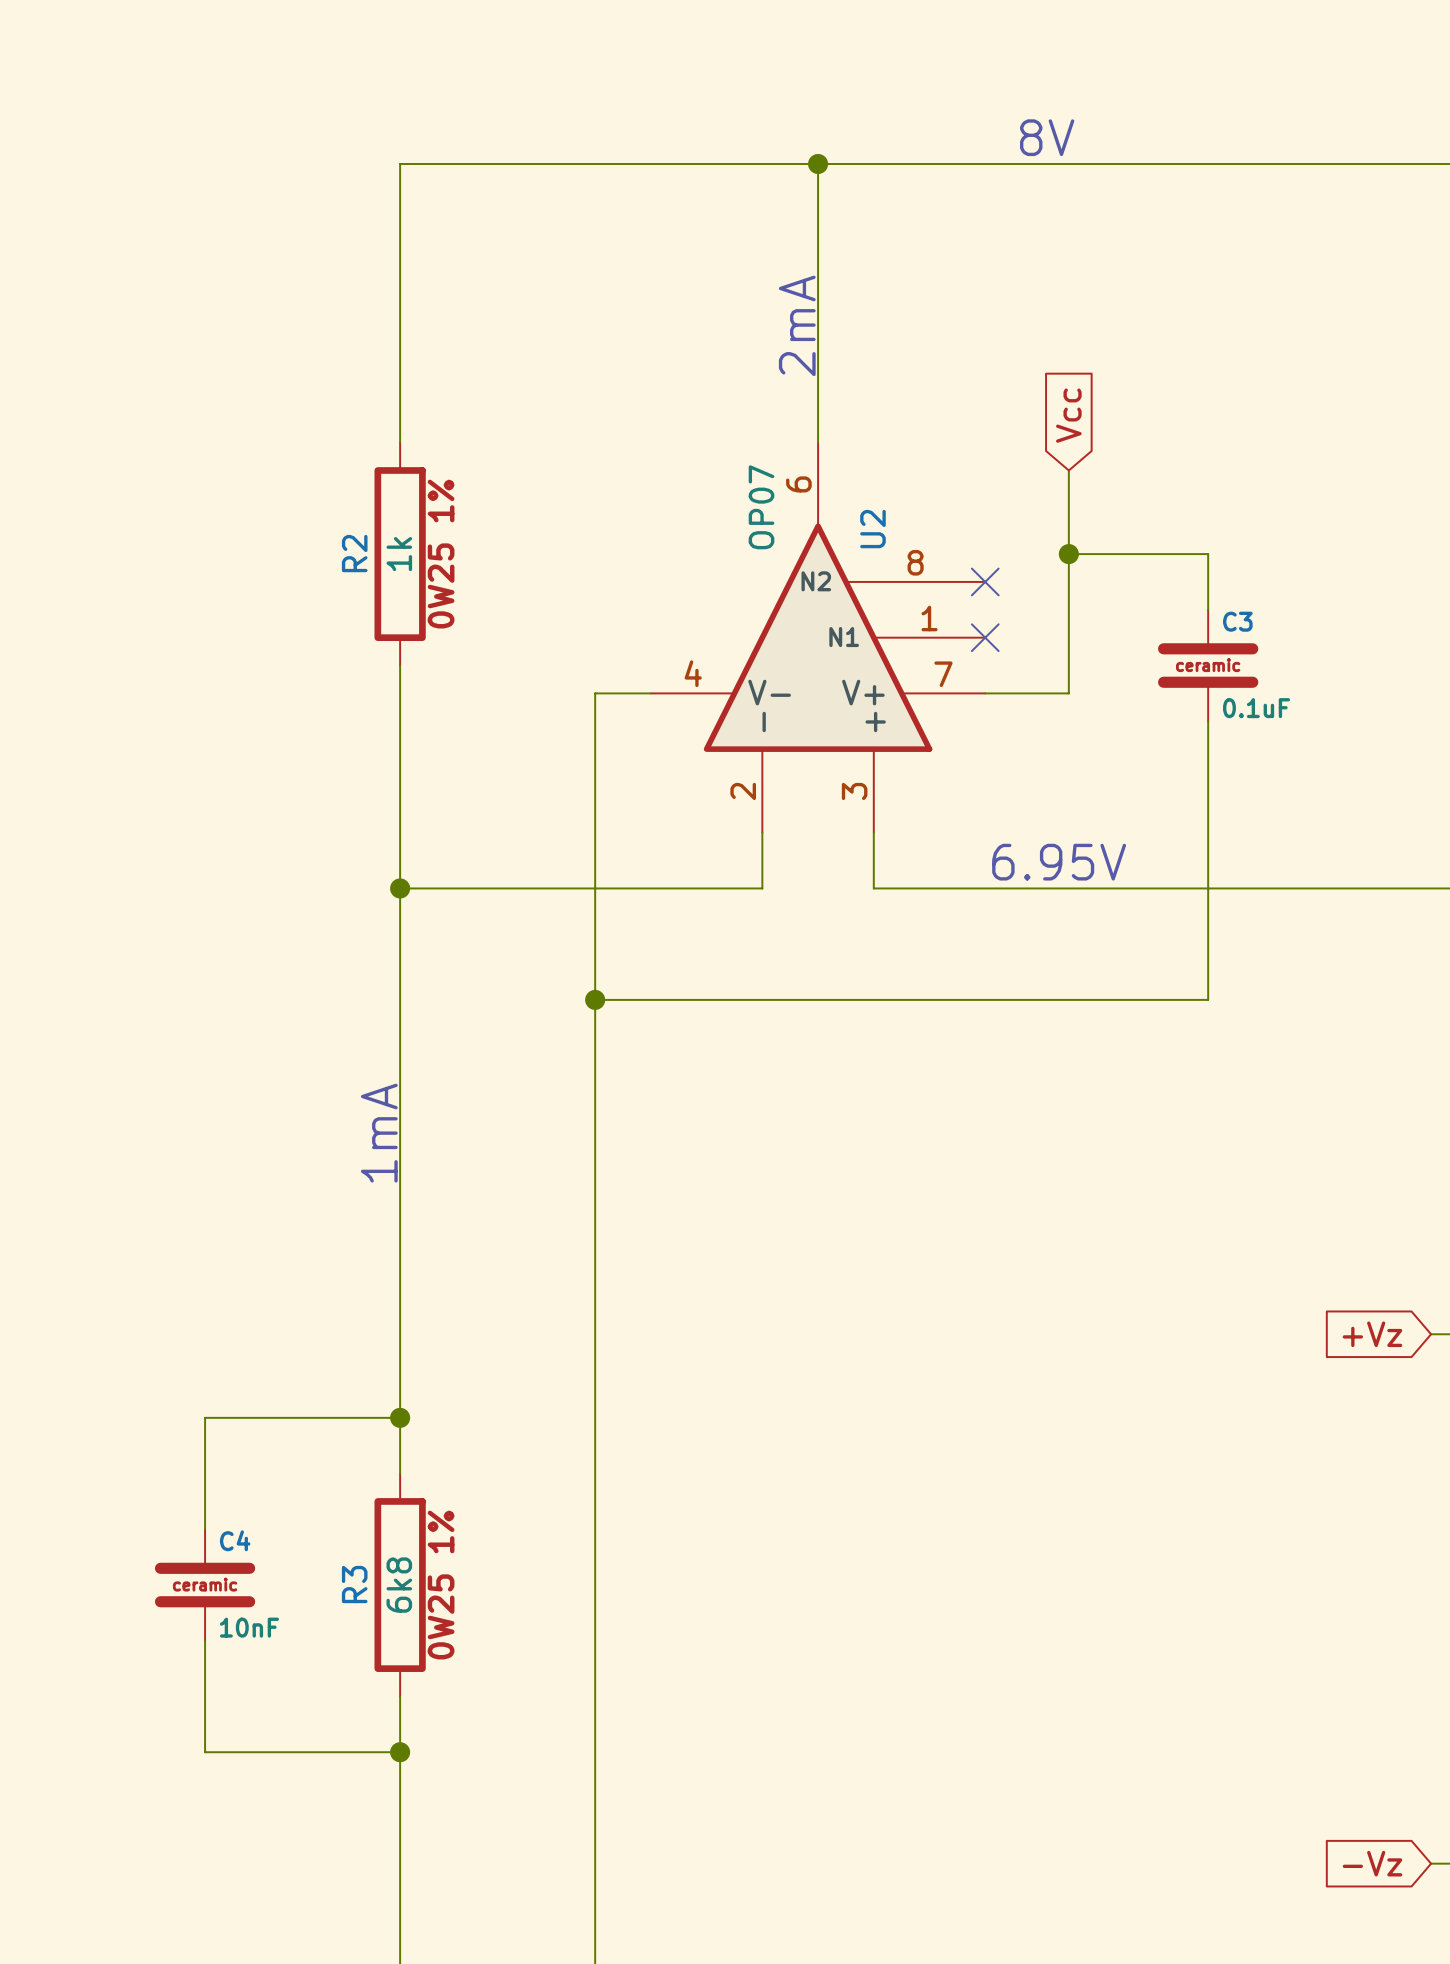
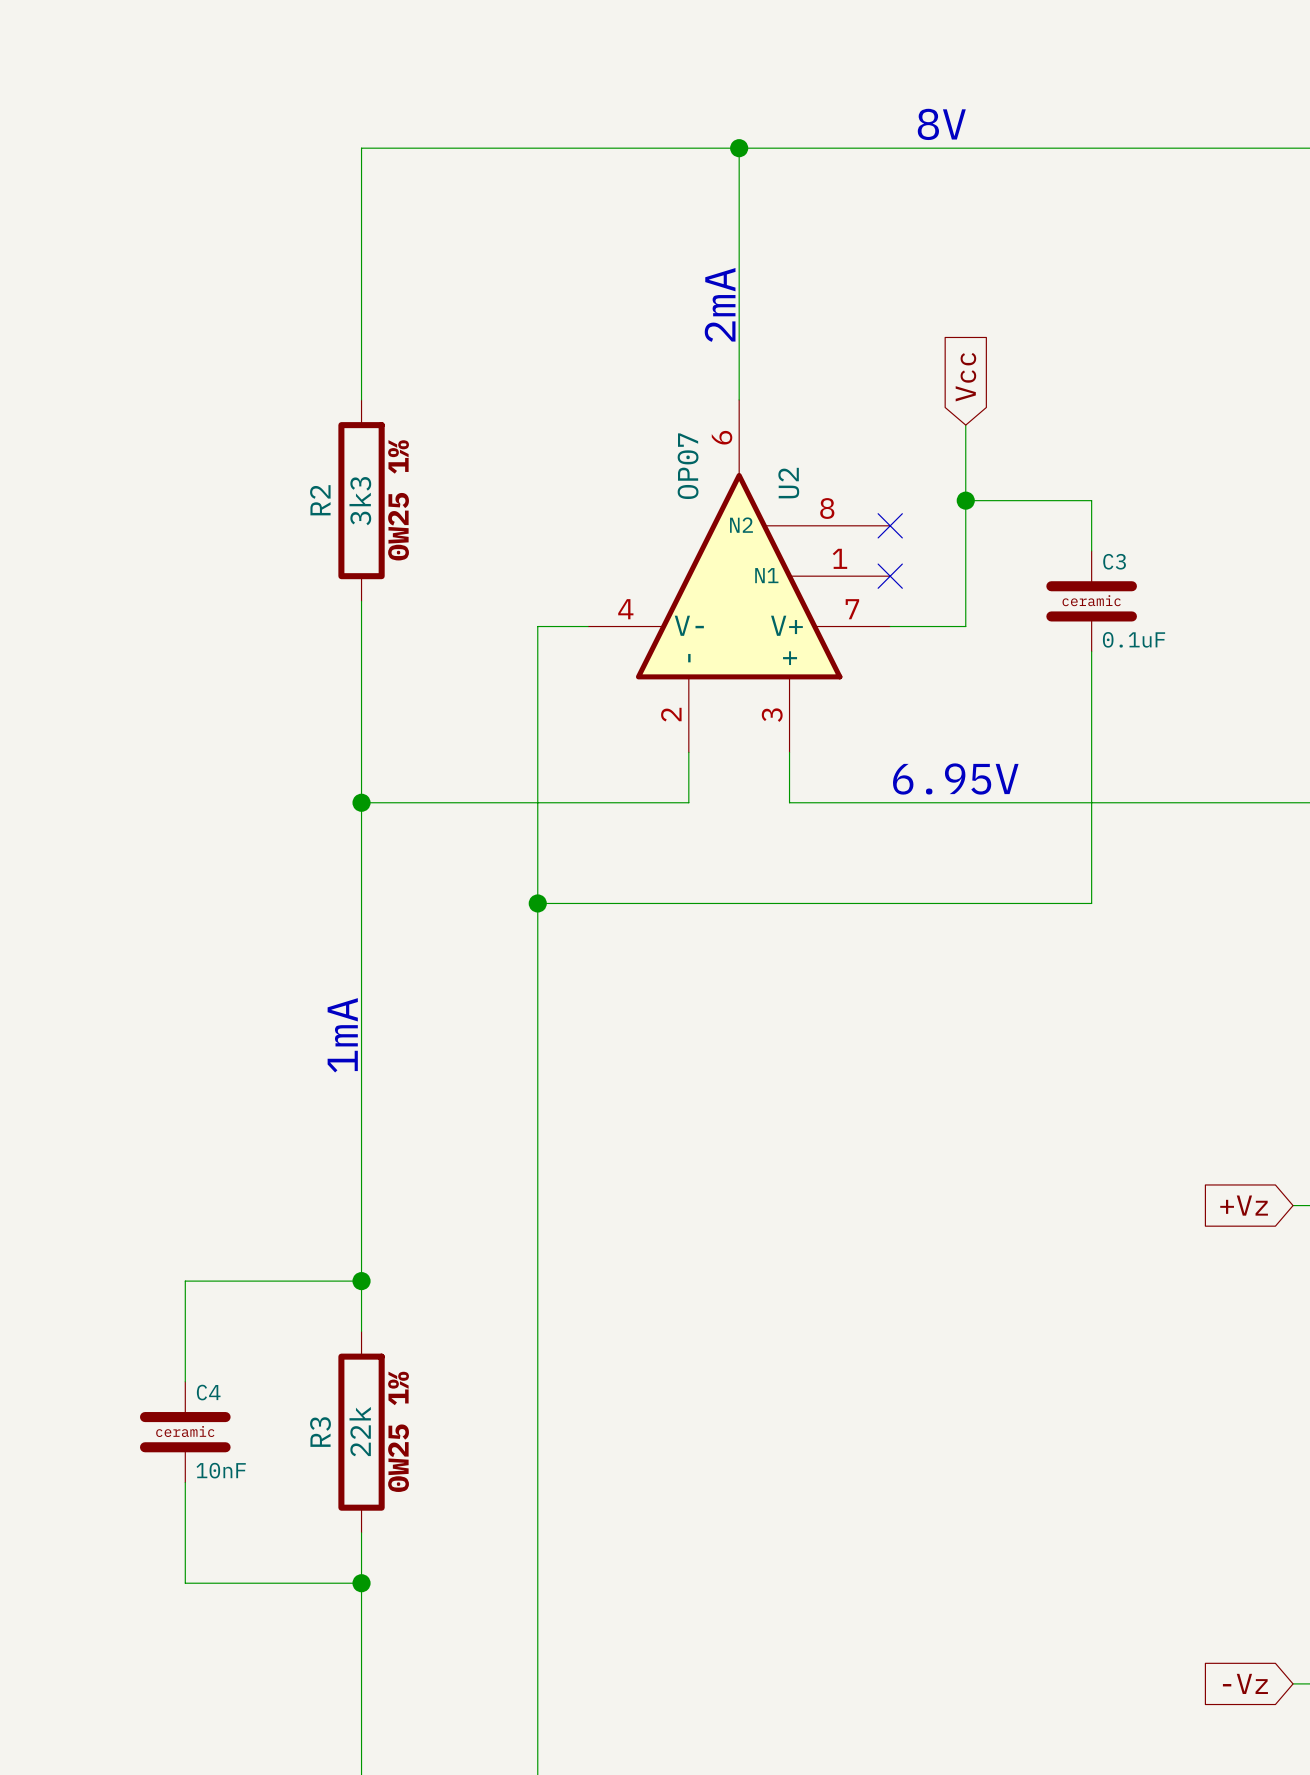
R2 value: 1k (399, 554) -> 3k3 (360, 501)
R3 value: 6k8 (399, 1585) -> 22k (360, 1431)

